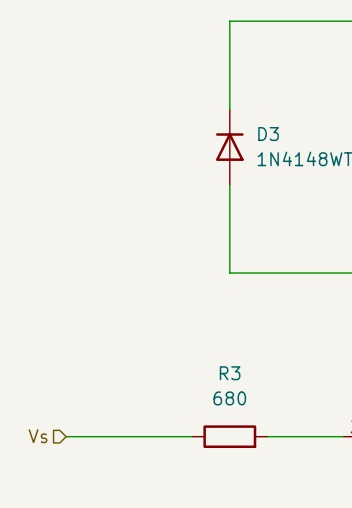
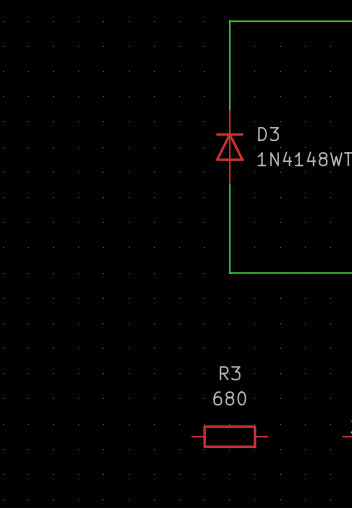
hierarchical label: Vs (38, 436) -> none
wire: (66, 436) (192, 436) -> none
wire: (267, 436) (343, 436) -> none

